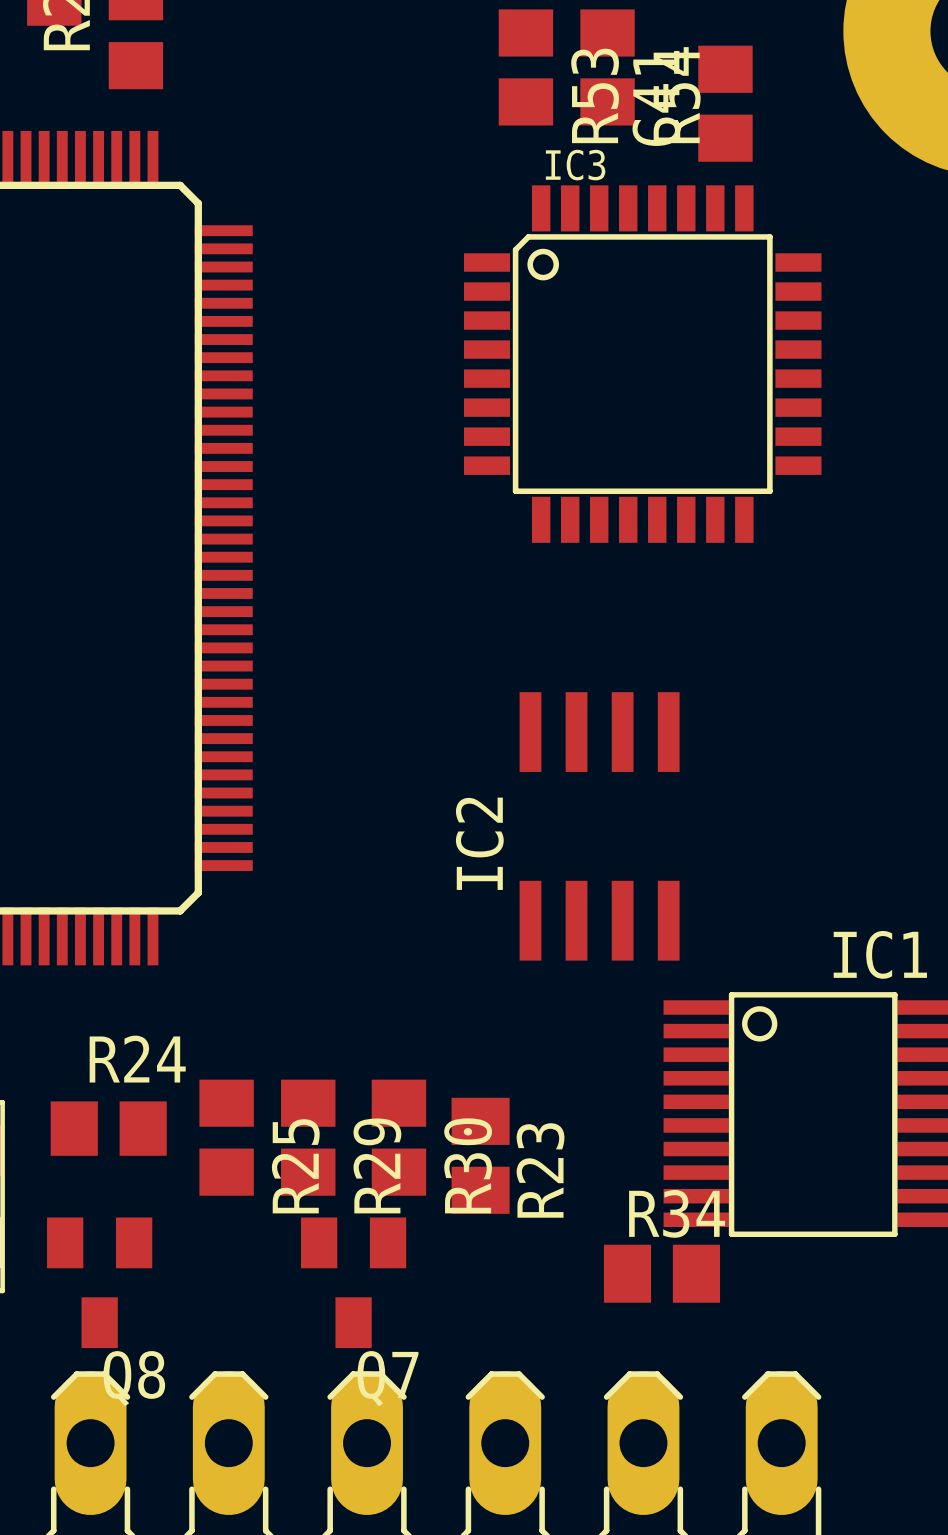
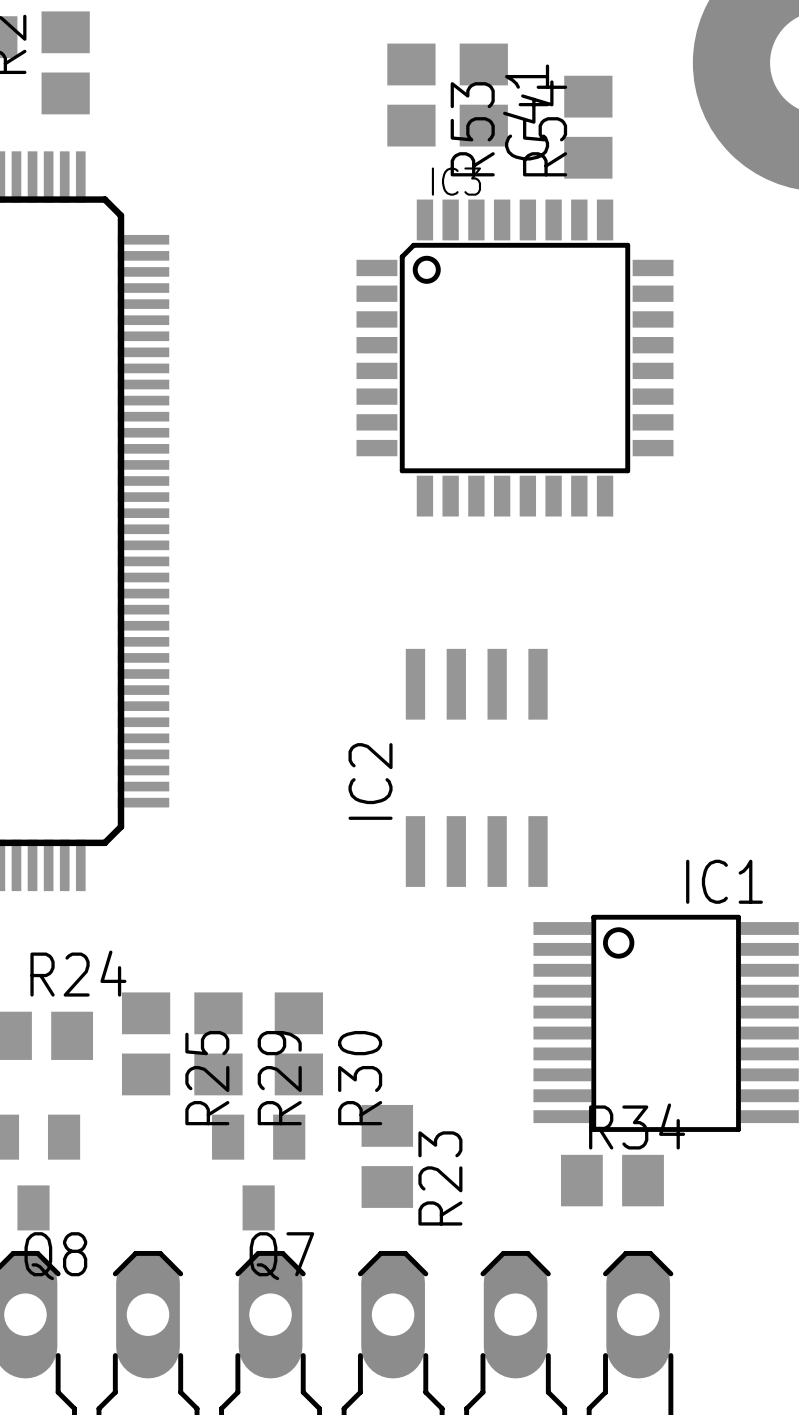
R23 position: (480, 1155) -> (387, 1156)
R34 position: (661, 1273) -> (612, 1180)

